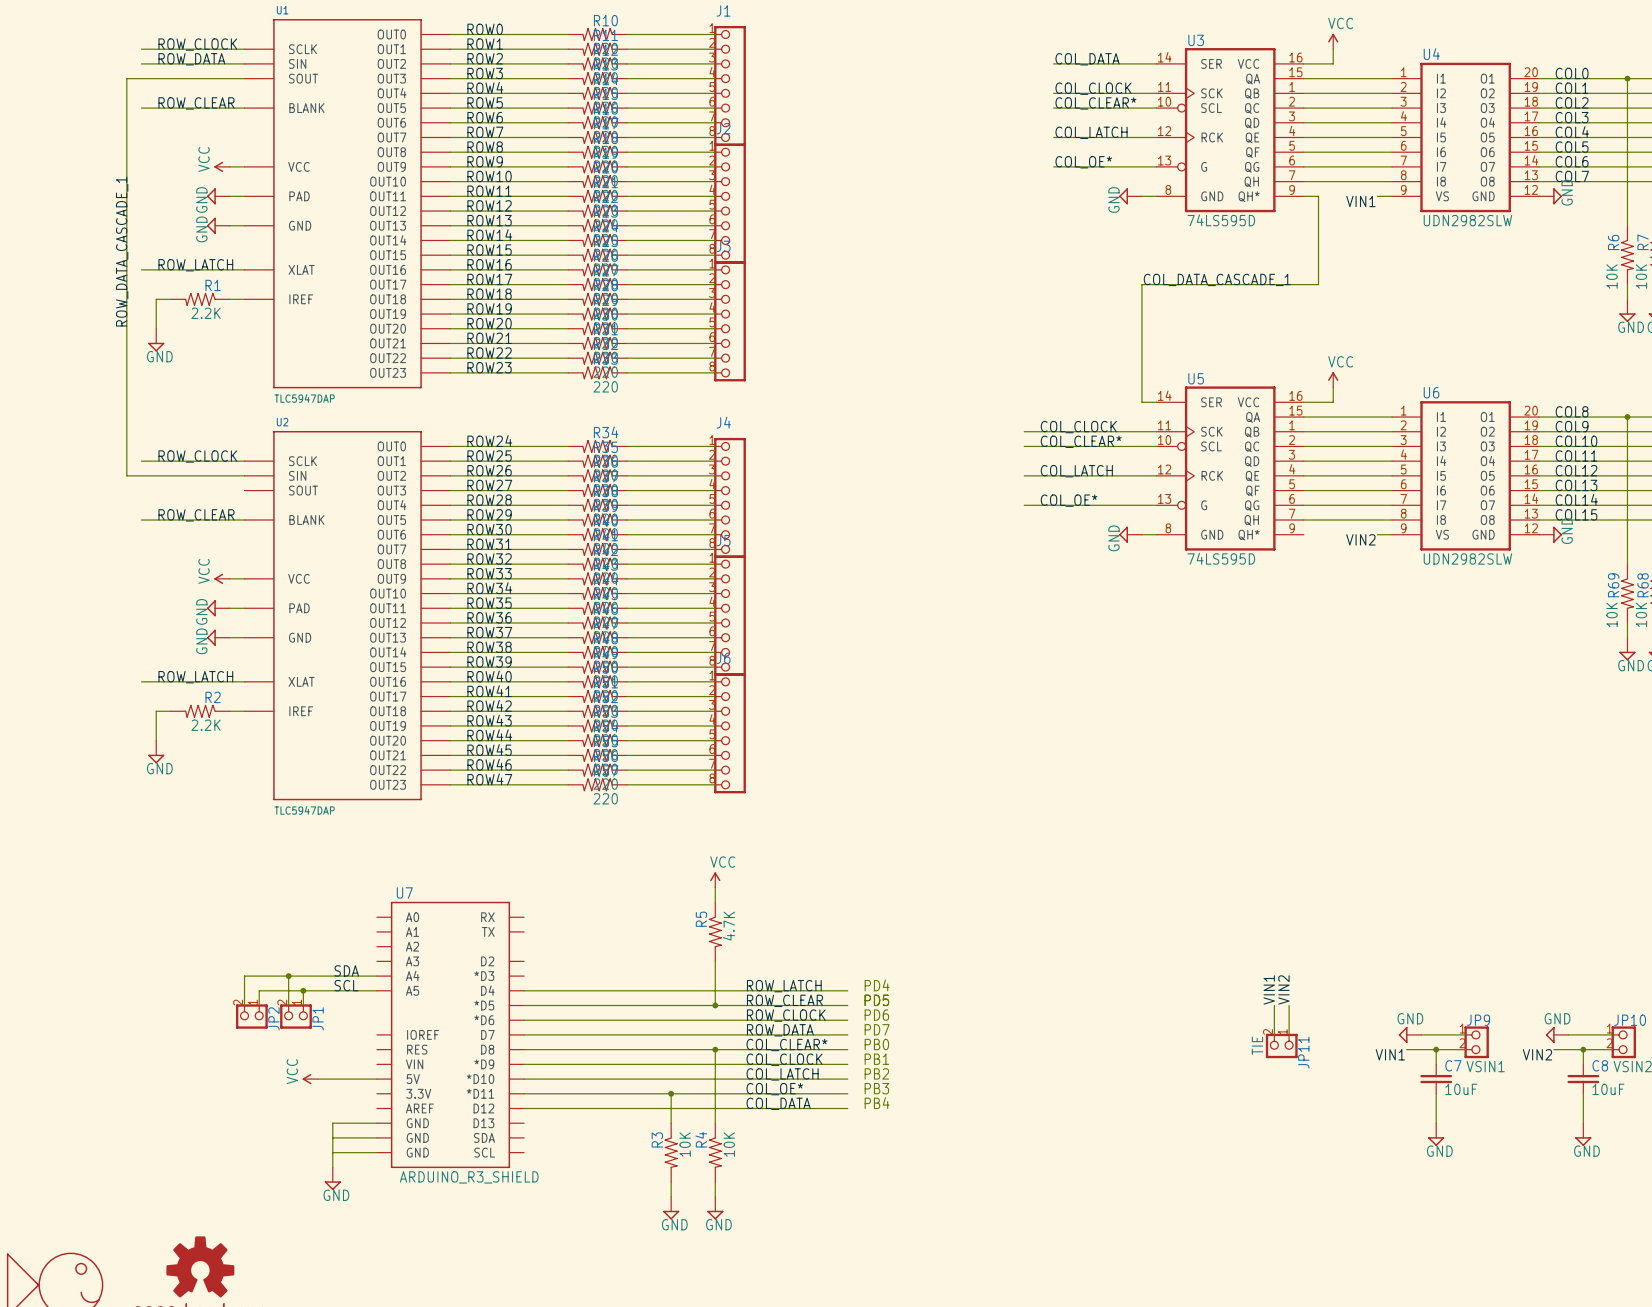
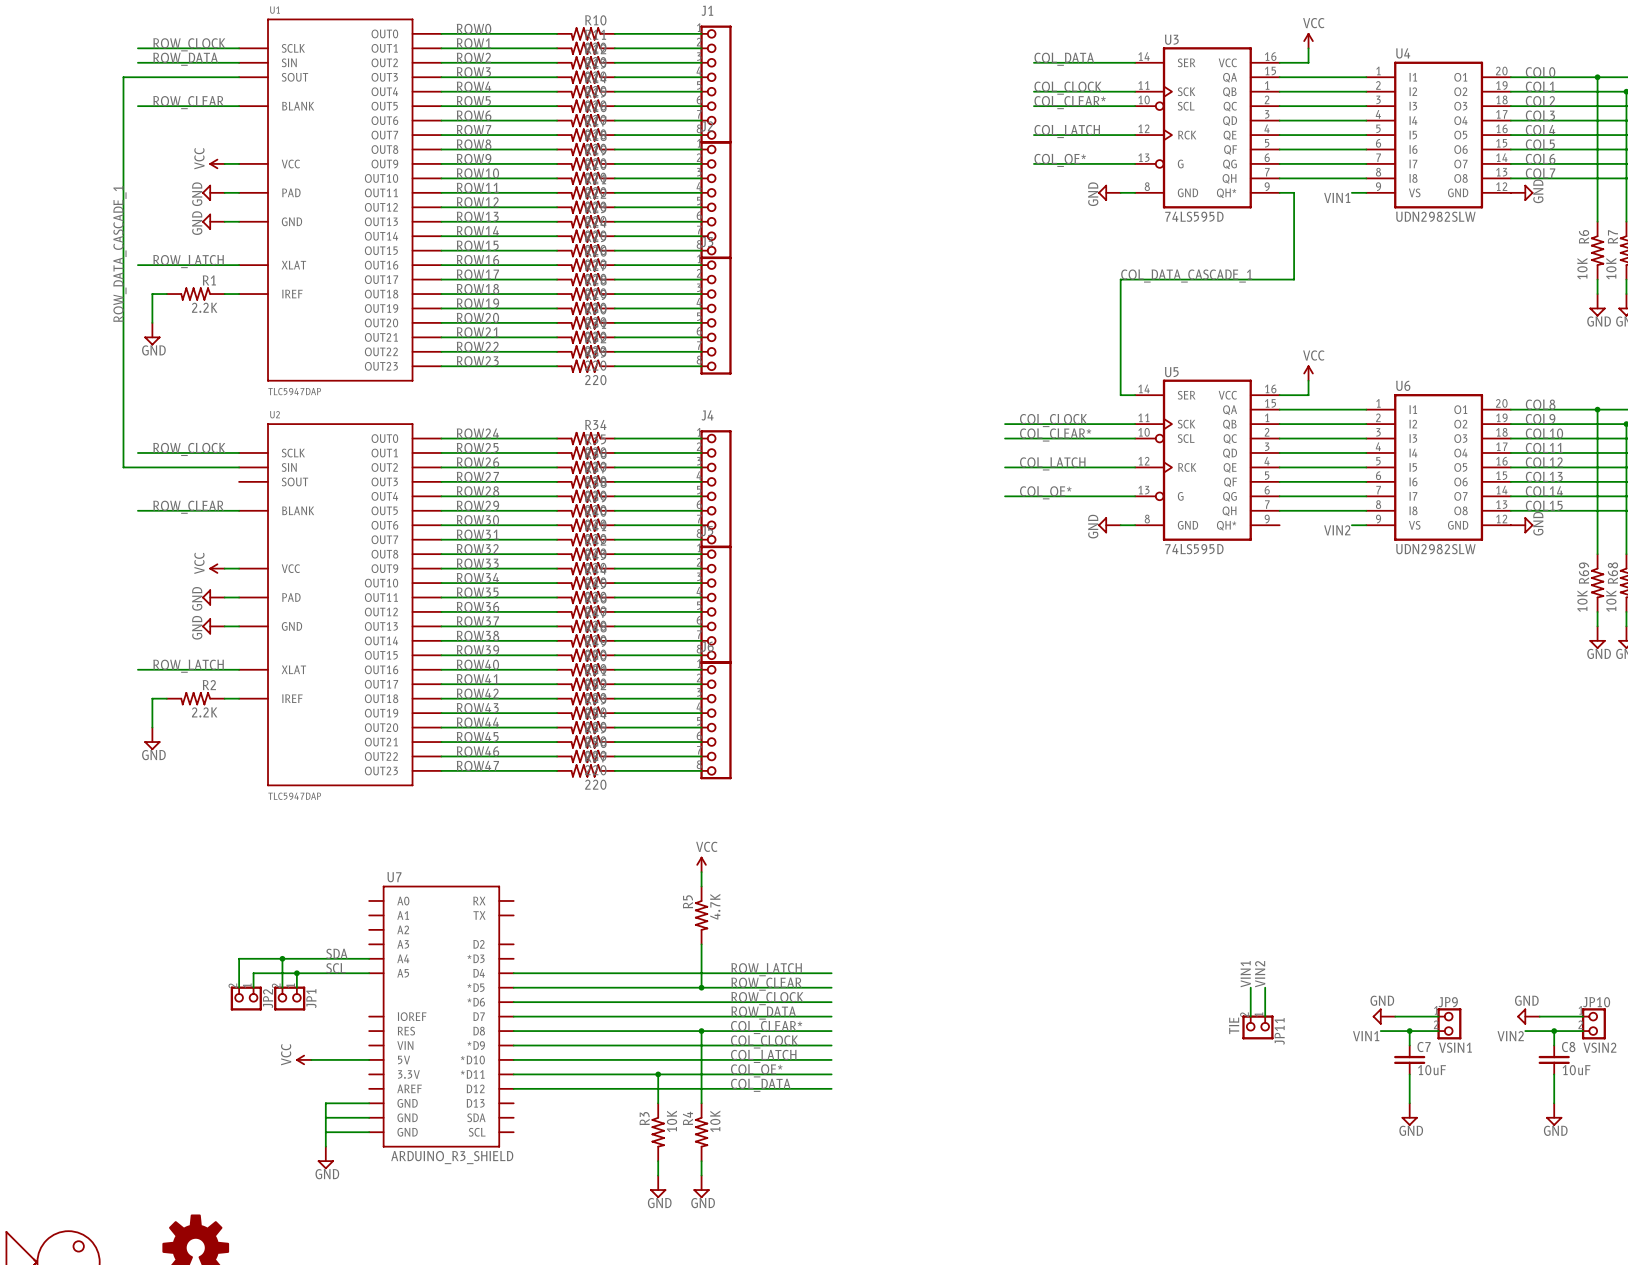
text: PD4 (877, 985) -> none
text: PD5 (876, 1000) -> none
text: PD6 (876, 1015) -> none
text: PD7 (877, 1029) -> none
text: PB0 (876, 1044) -> none
text: PB1 (876, 1059) -> none
text: PB2 (876, 1073) -> none
text: PB3 (876, 1088) -> none
text: PB4 (877, 1103) -> none

